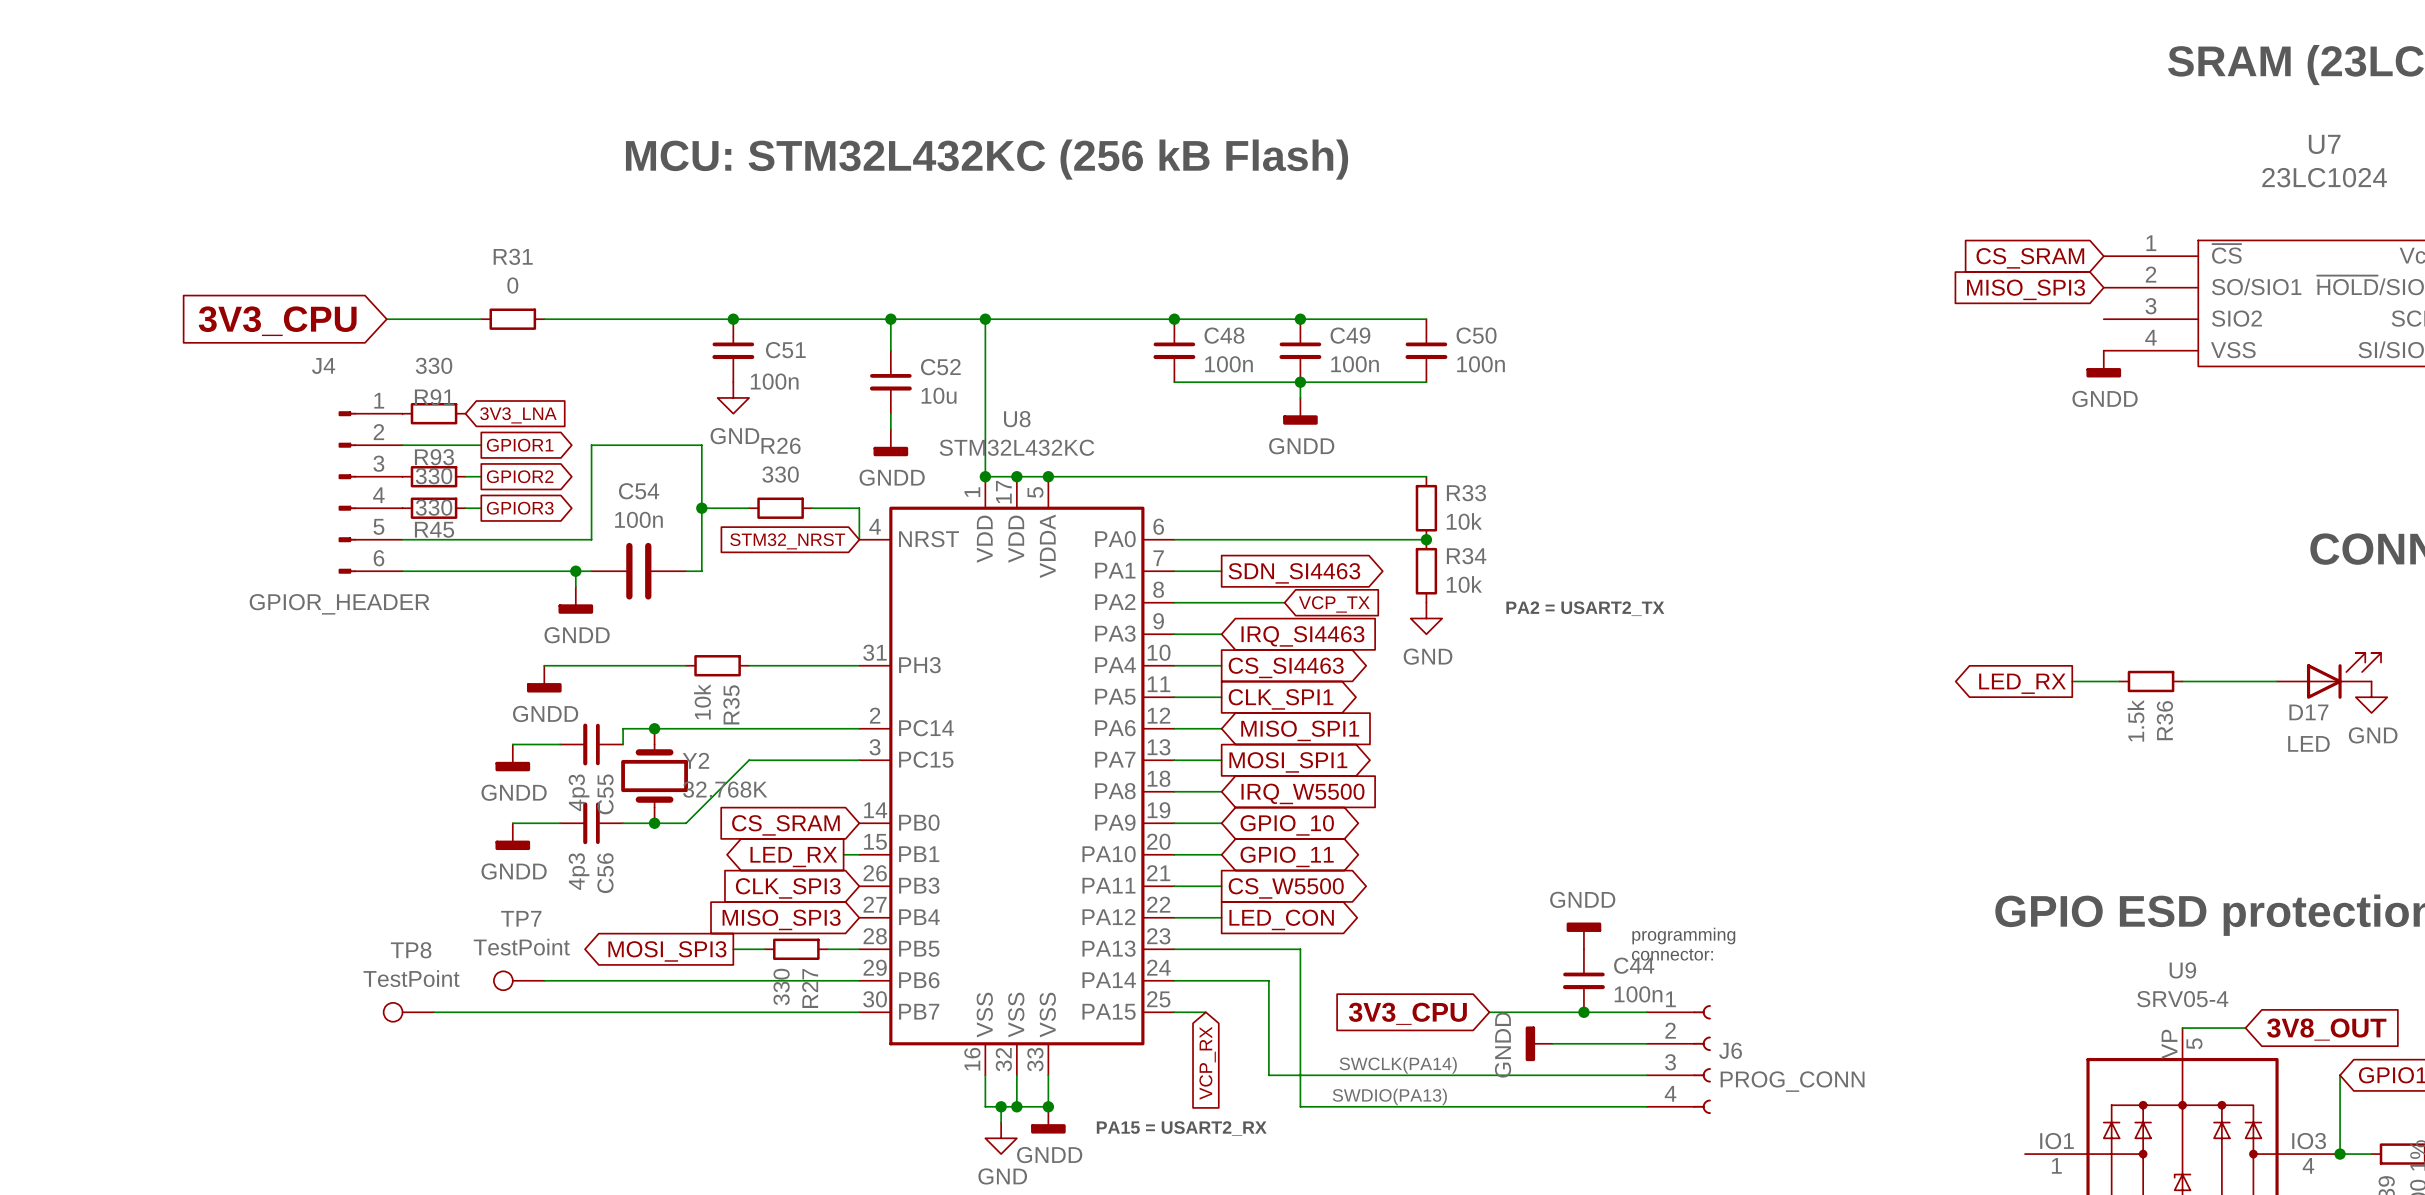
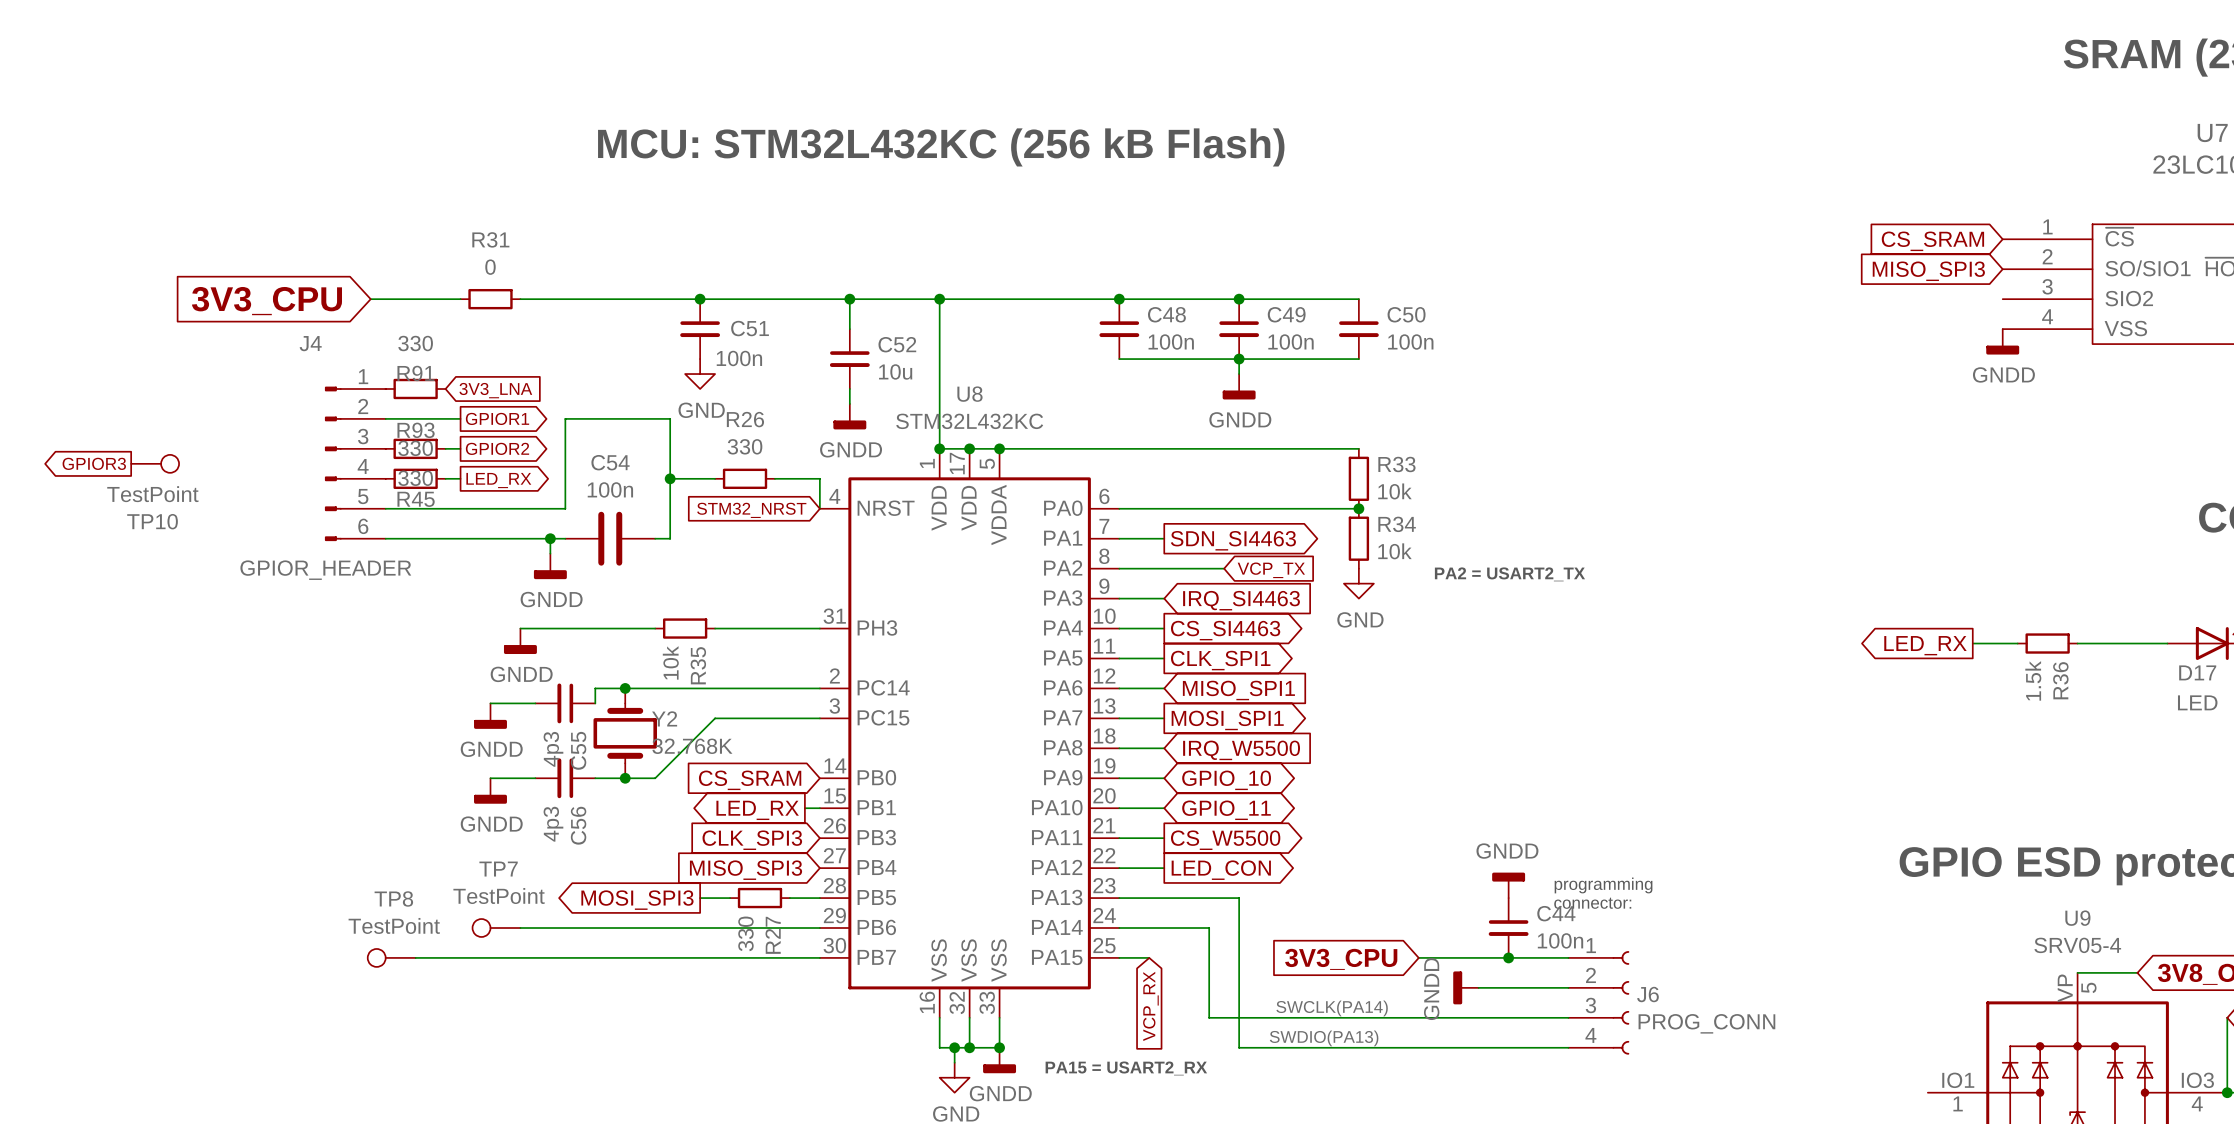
global label: none -> GPIOR3 (94, 463)
TP10: none -> TestPoint (155, 463)
global label: GPIOR3 (520, 508) -> LED_RX (498, 480)

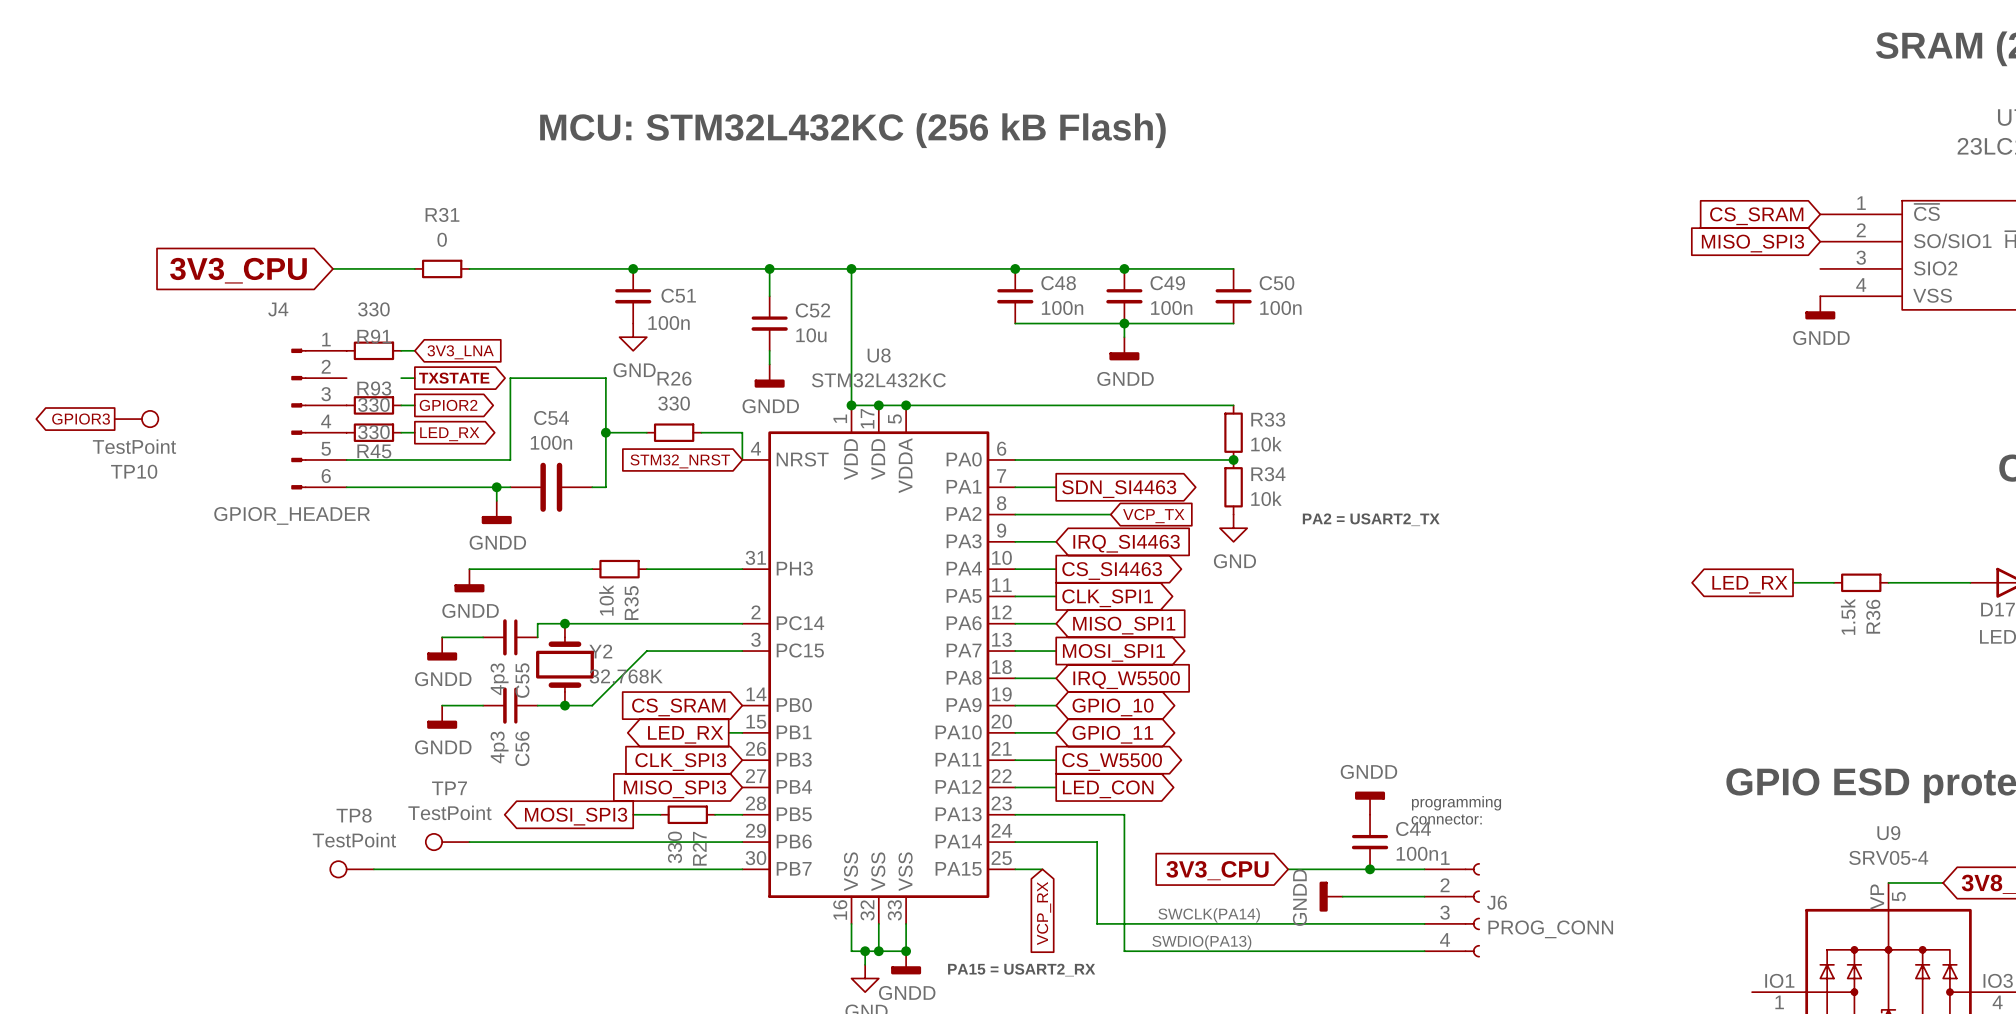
wire: none -> (401, 350) (414, 350)
global label position: 3V3_LNA (495, 390) -> 3V3_LNA (460, 352)
wire: (385, 418) (445, 418) -> none
global label: GPIOR1 (497, 418) -> TXSTATE (454, 378)

